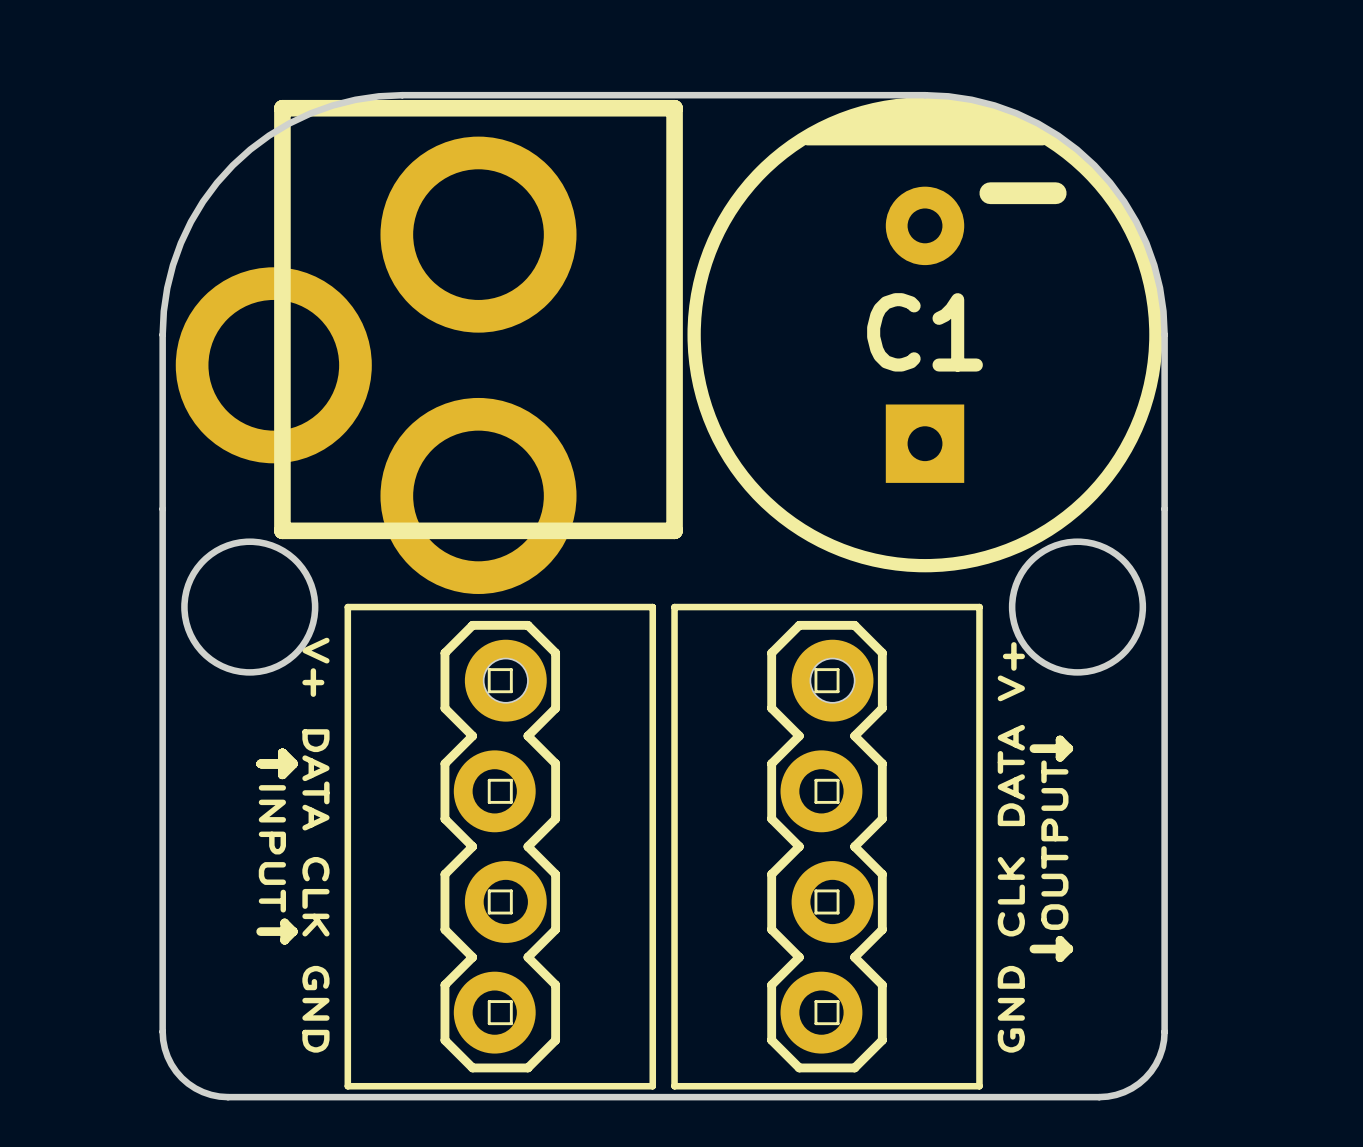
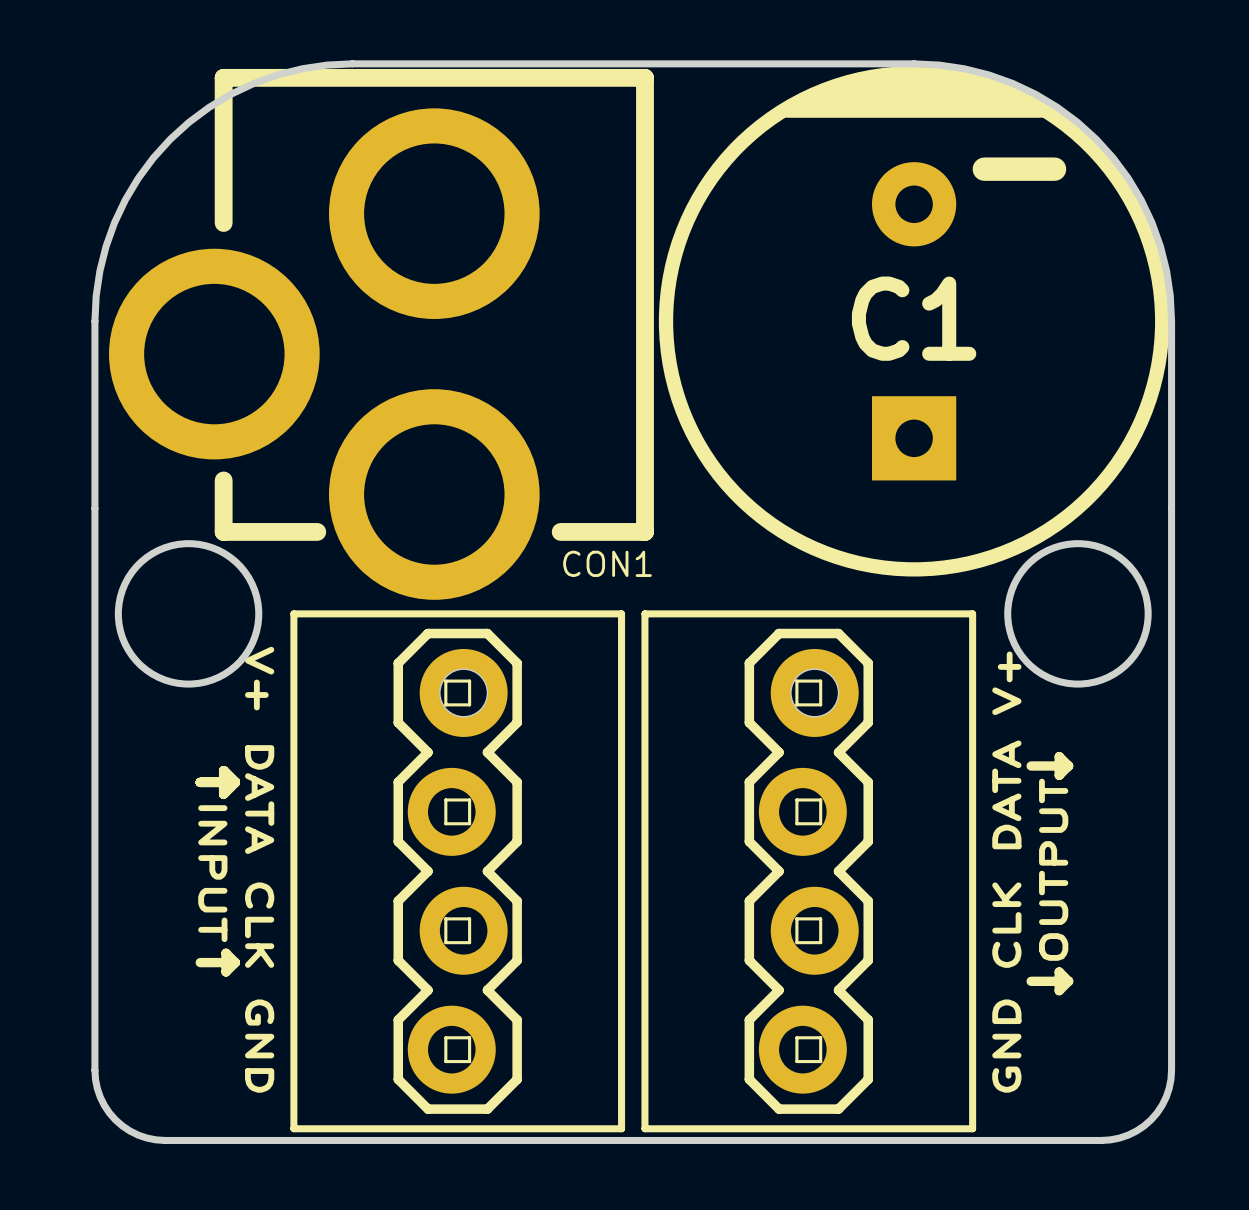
part: (429, 346) -> none
CON1: none -> (381, 334)

